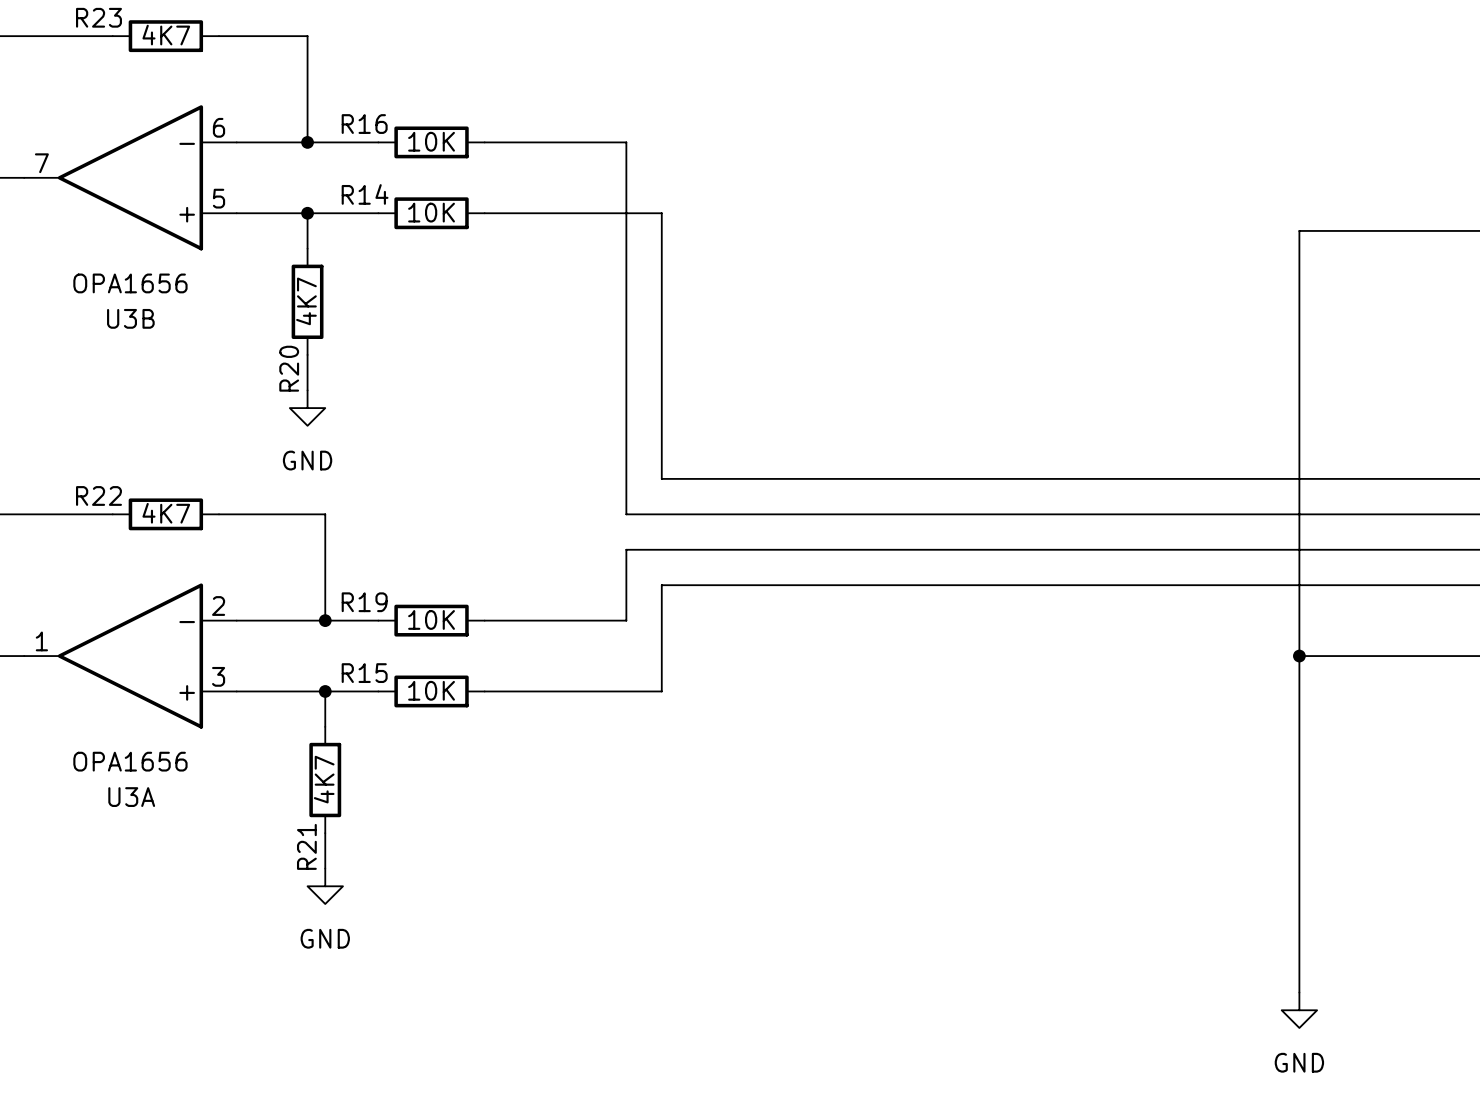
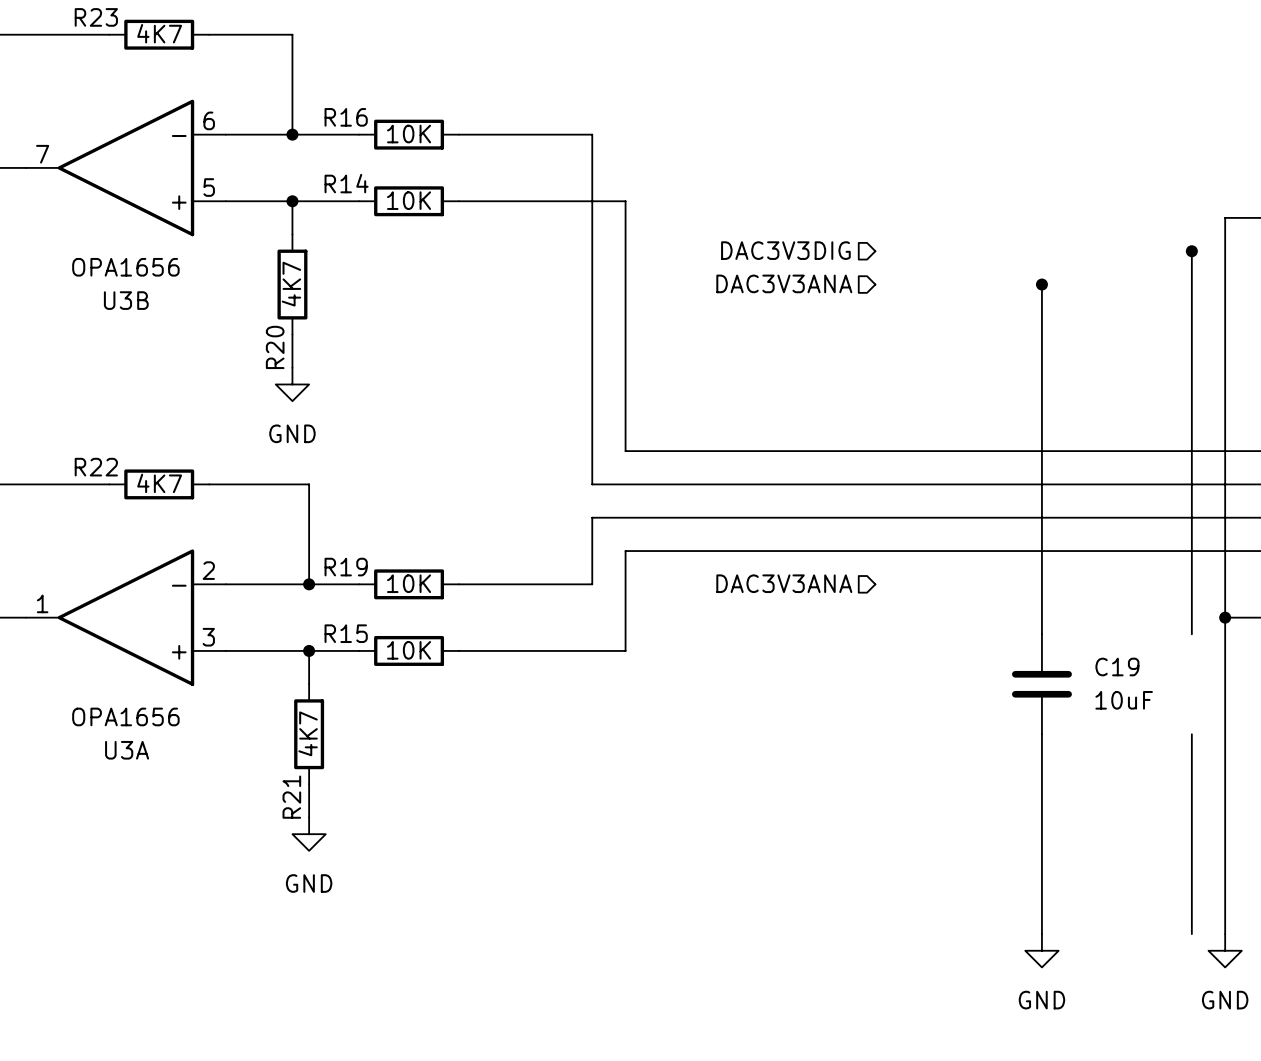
hierarchical label: none -> DAC3V3DIG (785, 250)
wire: none -> (1191, 251) (1191, 634)
junction: none -> (1191, 251)
hierarchical label: none -> DAC3V3ANA (784, 283)
wire: none -> (1041, 284) (1041, 634)
junction: none -> (1041, 284)
hierarchical label: none -> DAC3V3ANA (784, 583)
C19: none -> 10uF (1041, 684)
wire: none -> (1041, 734) (1041, 934)
wire: none -> (1191, 734) (1191, 934)
power symbol: none -> GND (1041, 950)

